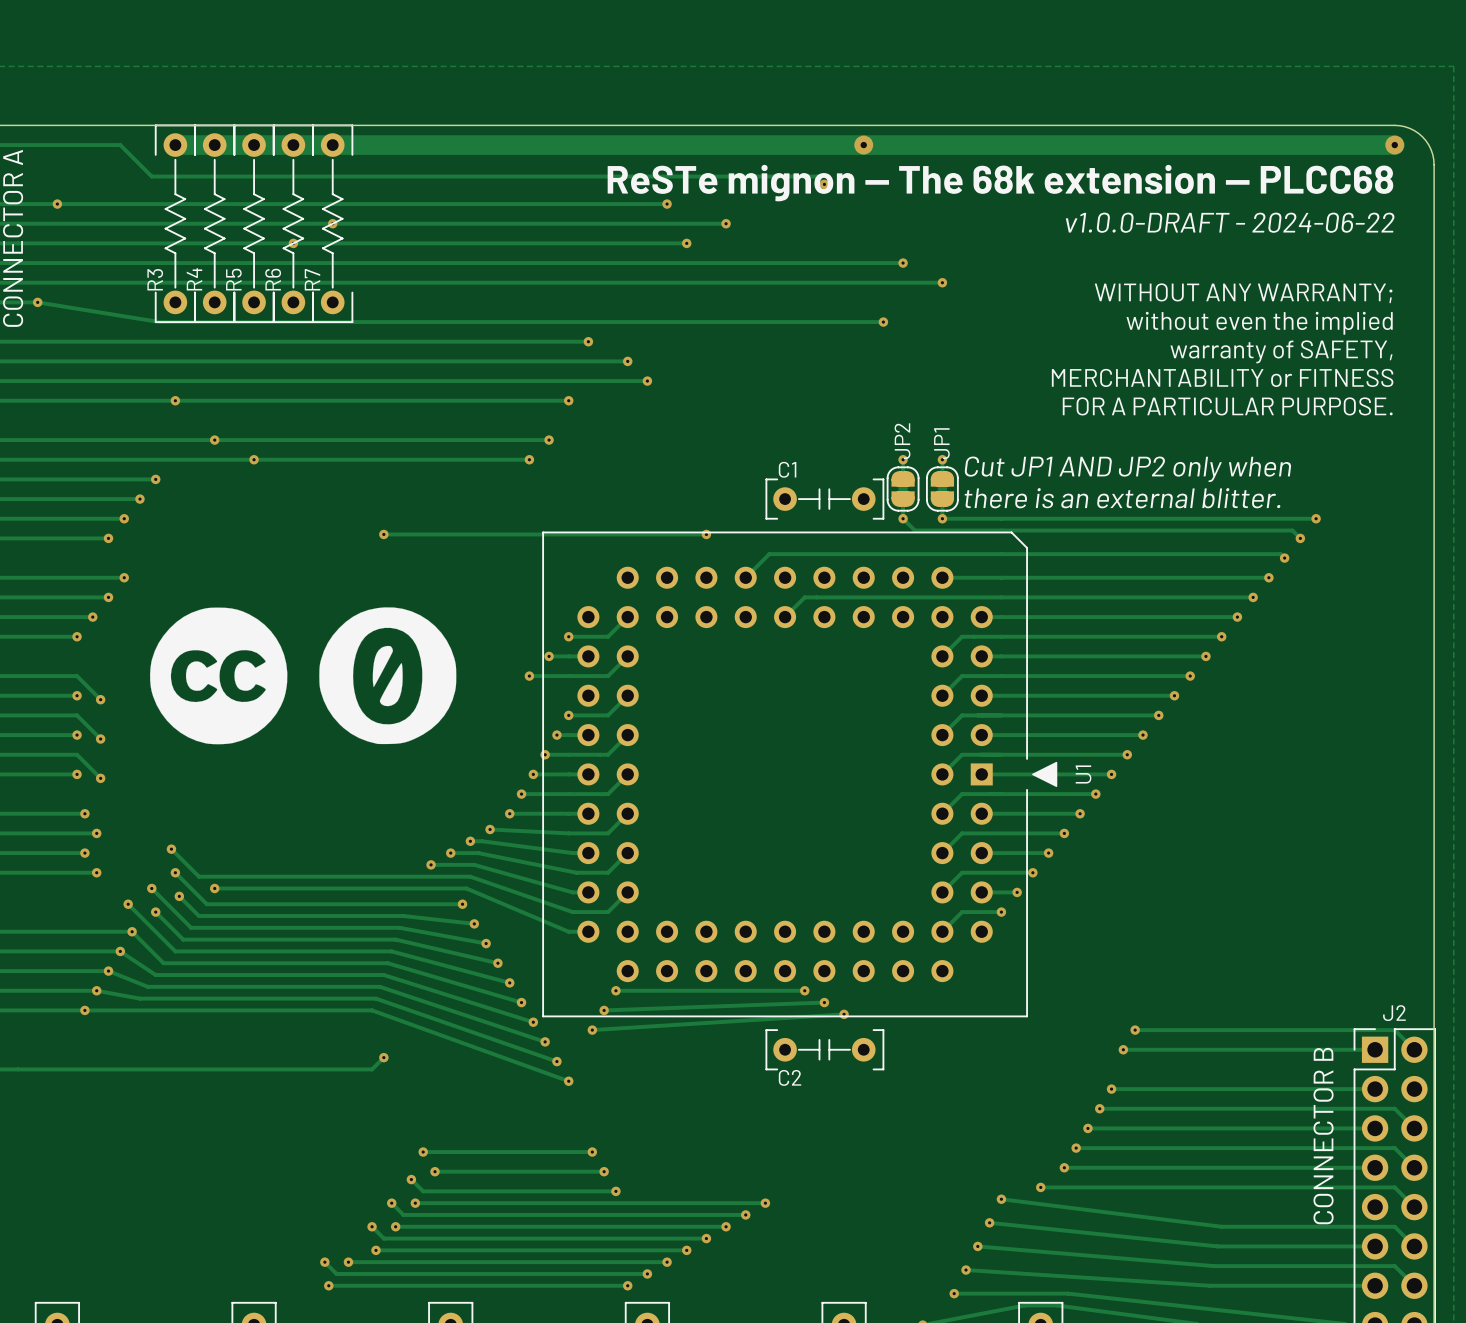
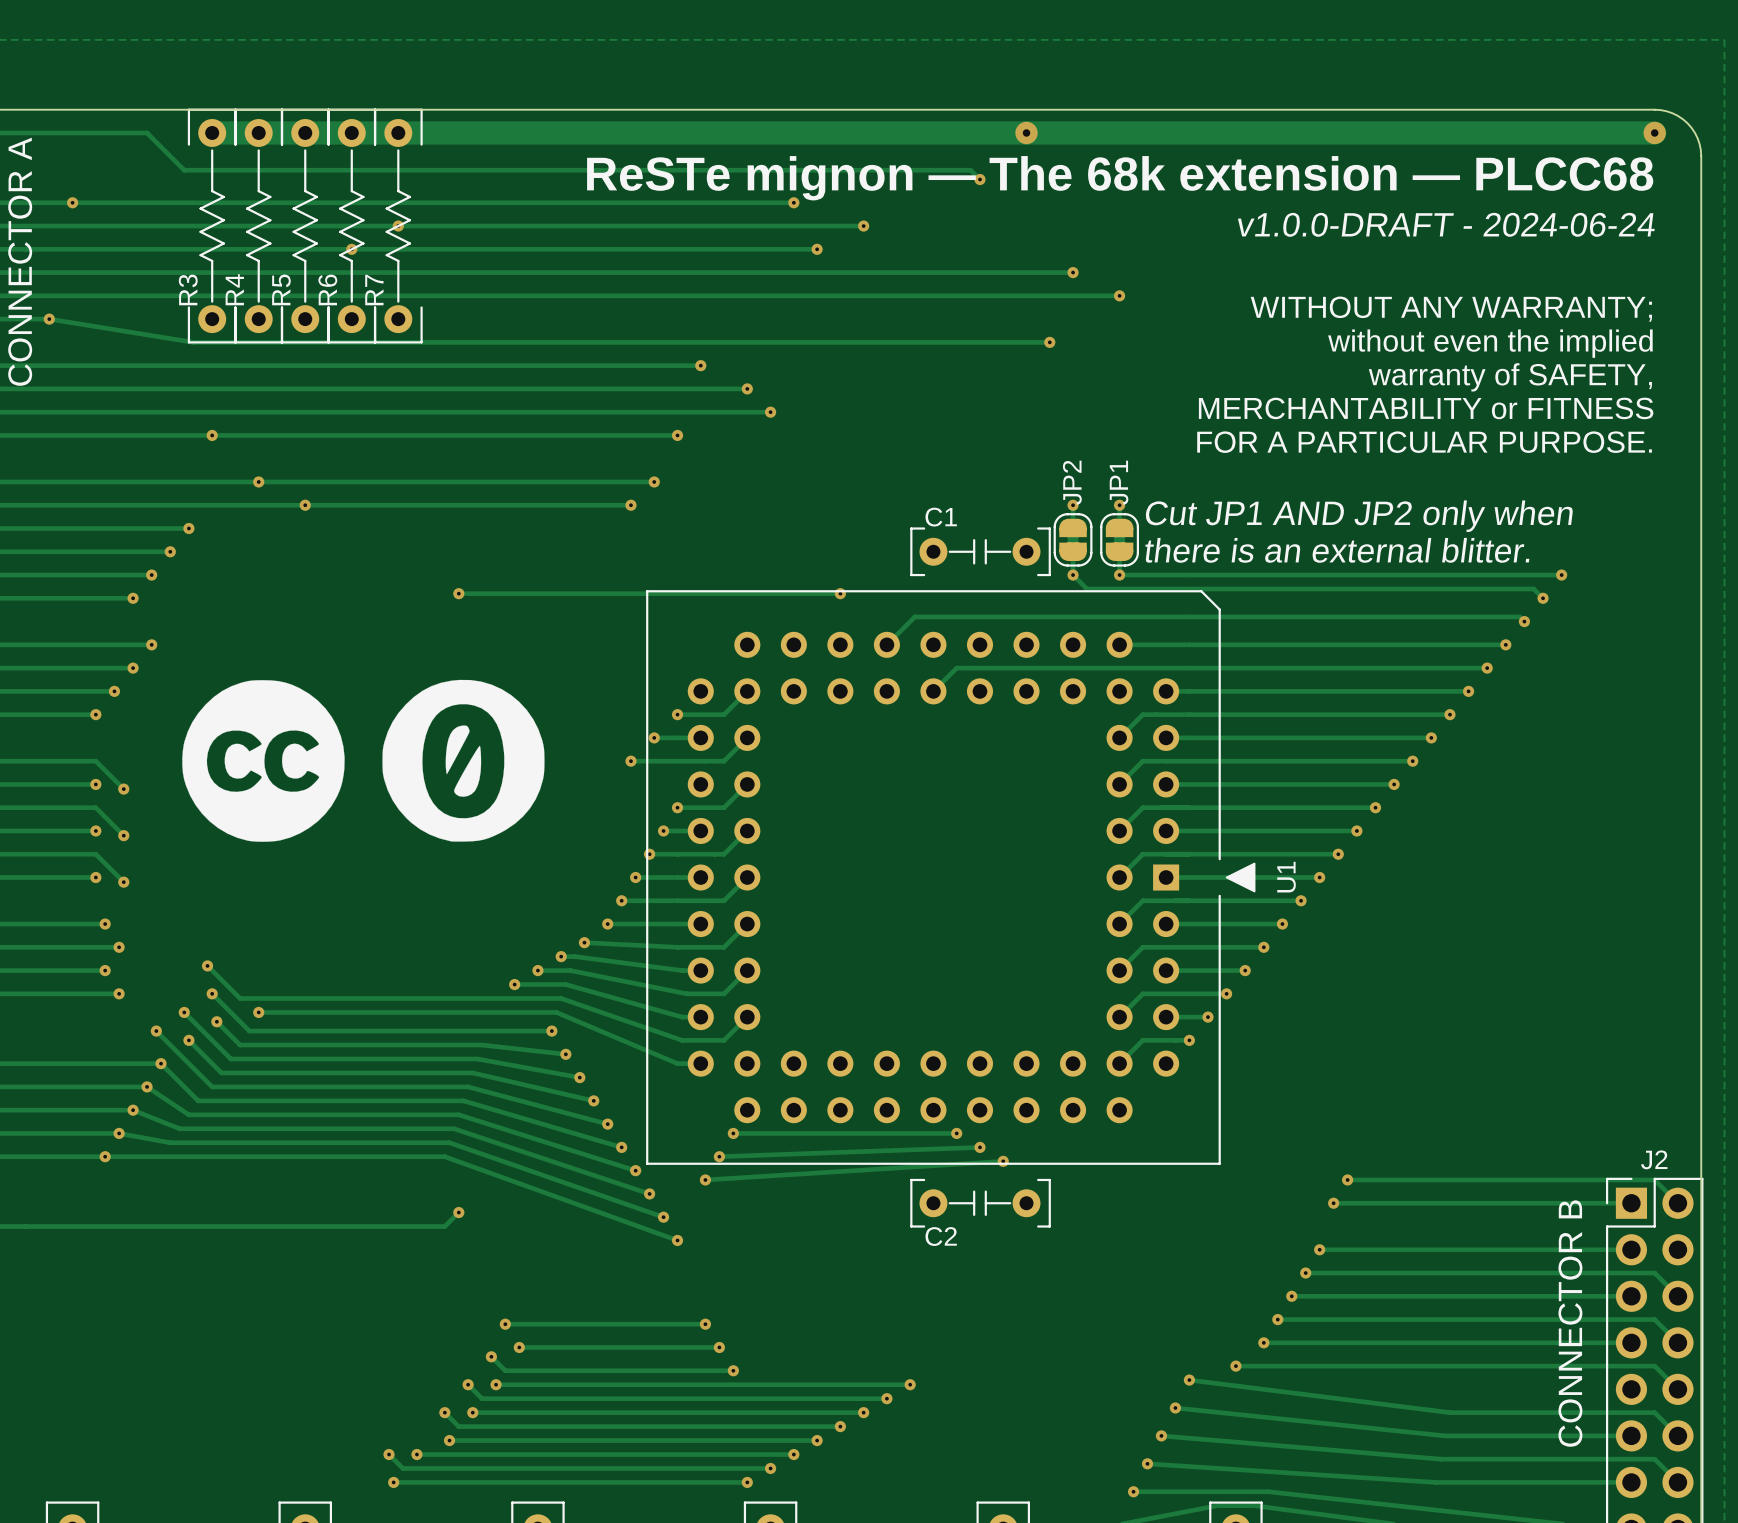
text: v1.0.0-DRAFT - 2024-06-22 (1230, 222) -> v1.0.0-DRAFT - 2024-06-24 (1446, 224)

